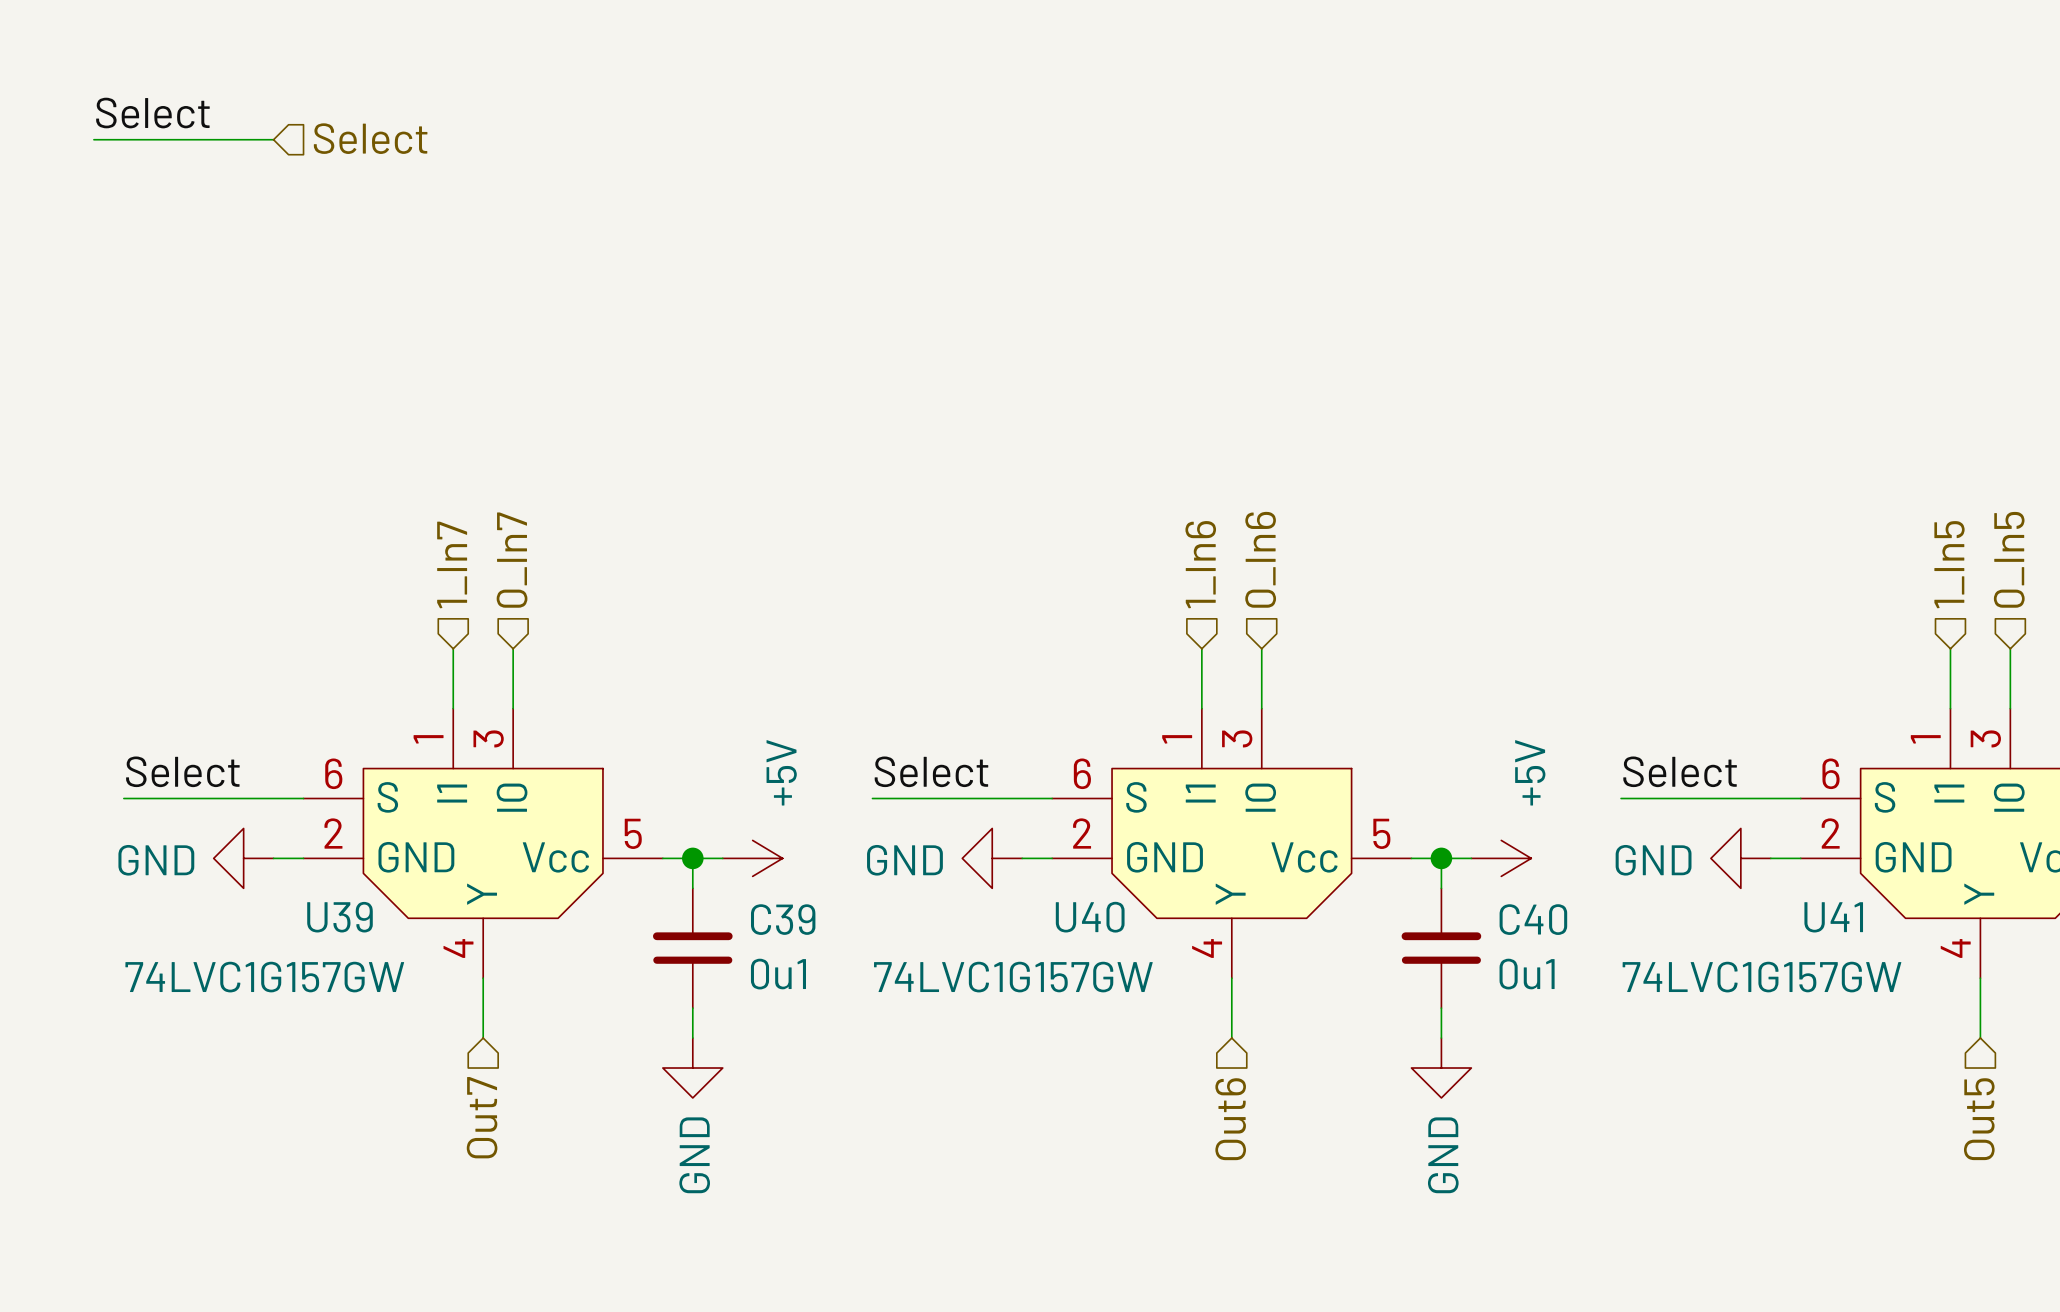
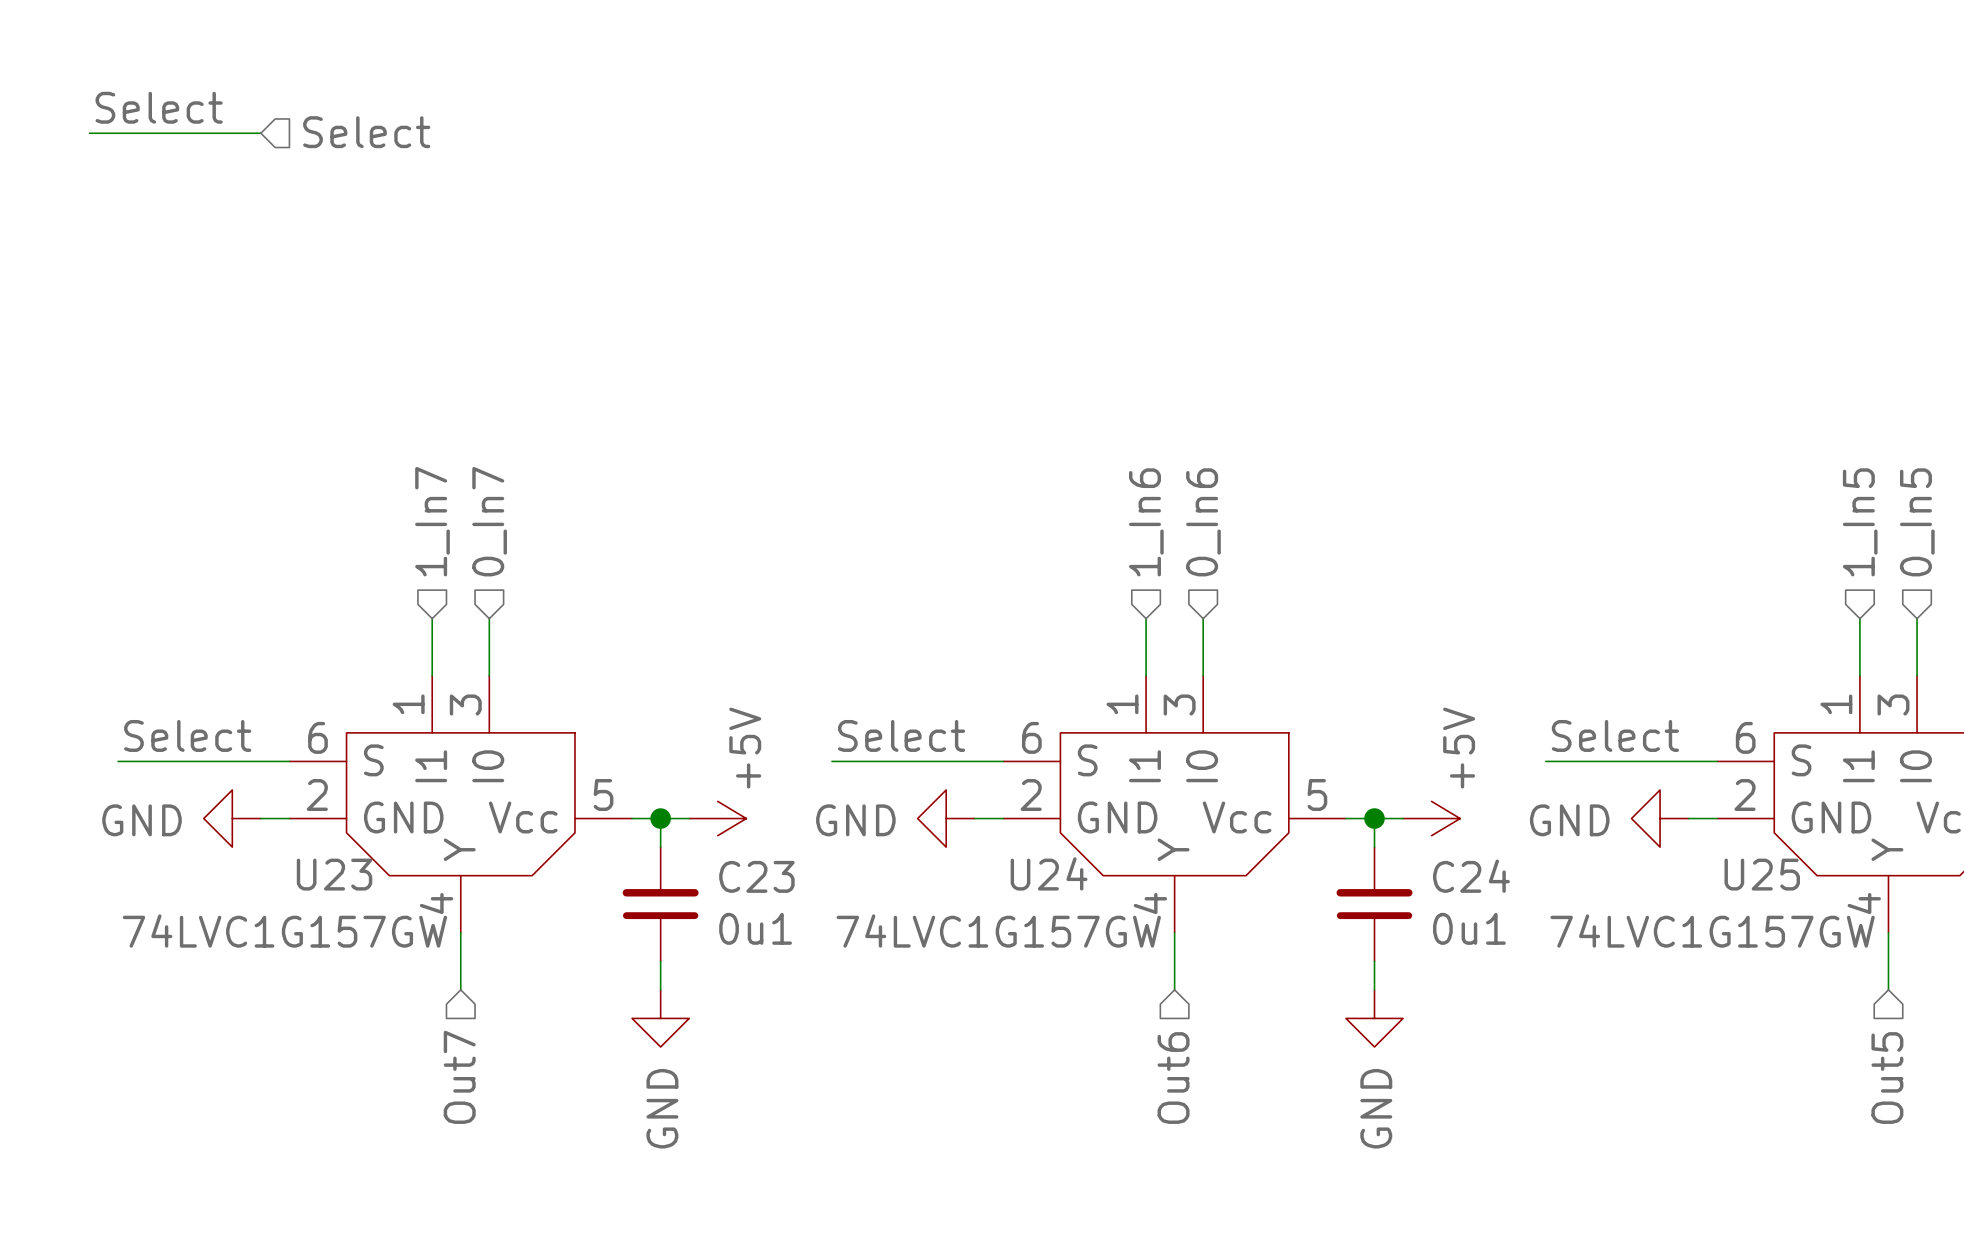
U39 name: U39 (339, 917) -> U23 (334, 874)
U40 name: U40 (1090, 917) -> U24 (1049, 873)
U41 name: U41 (1833, 917) -> U25 (1762, 874)
C39 name: C39 (783, 919) -> C23 (756, 876)
C40 name: C40 (1533, 919) -> C24 (1471, 876)

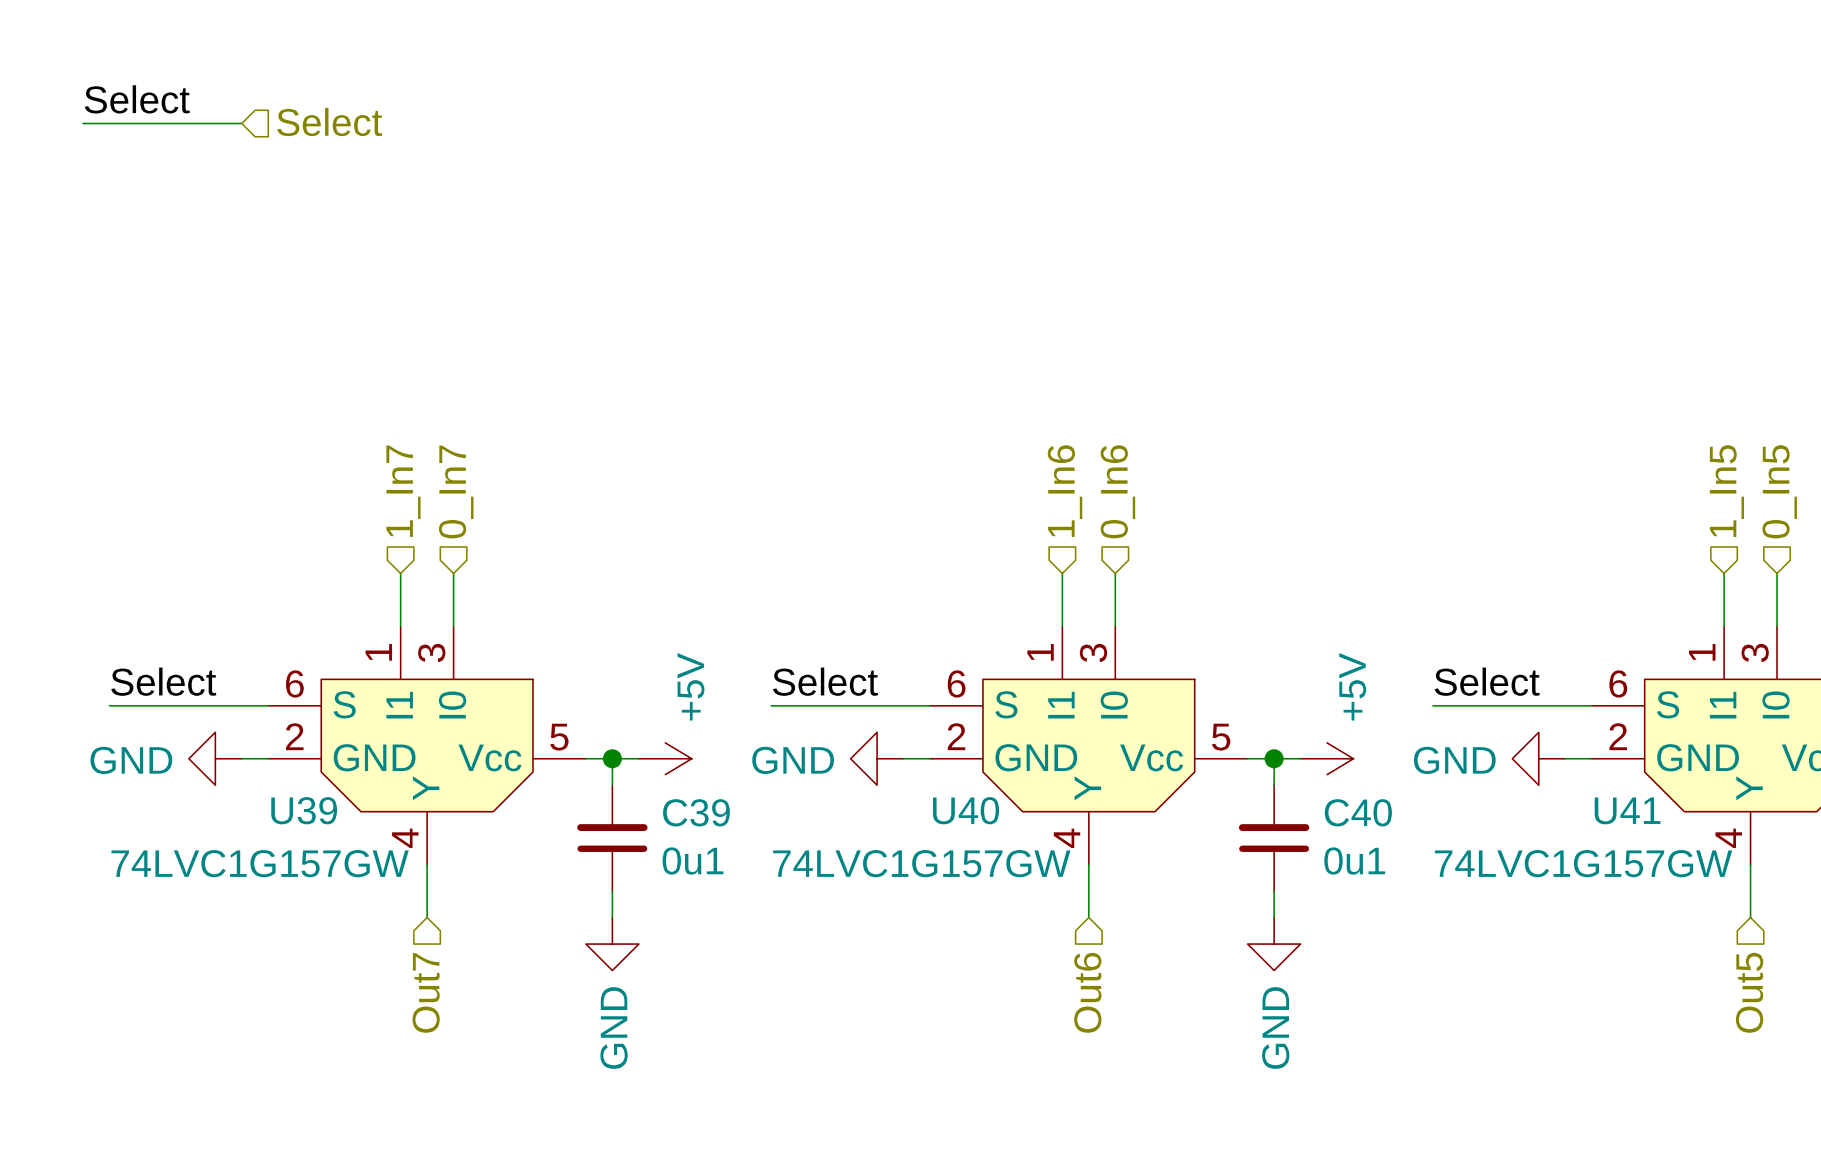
U24 name: U24 (1049, 873) -> U40 (966, 810)
U23 name: U23 (334, 874) -> U39 (304, 810)
U25 name: U25 (1762, 874) -> U41 (1627, 810)
C23 name: C23 (756, 876) -> C39 (696, 812)
C24 name: C24 (1471, 876) -> C40 (1358, 812)

